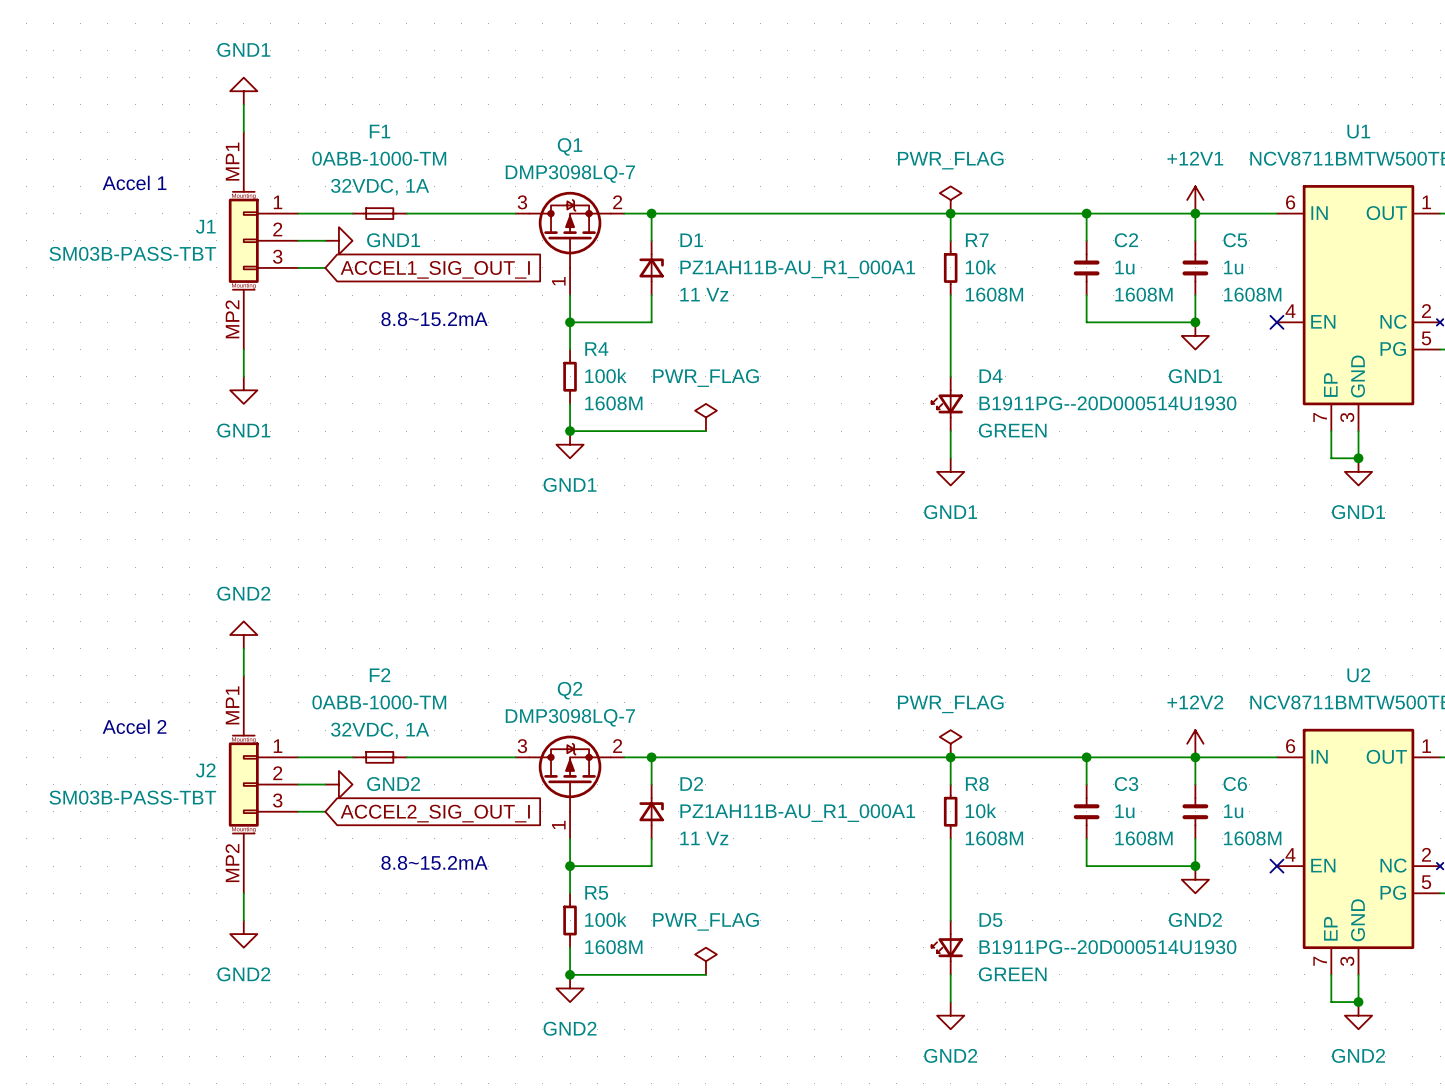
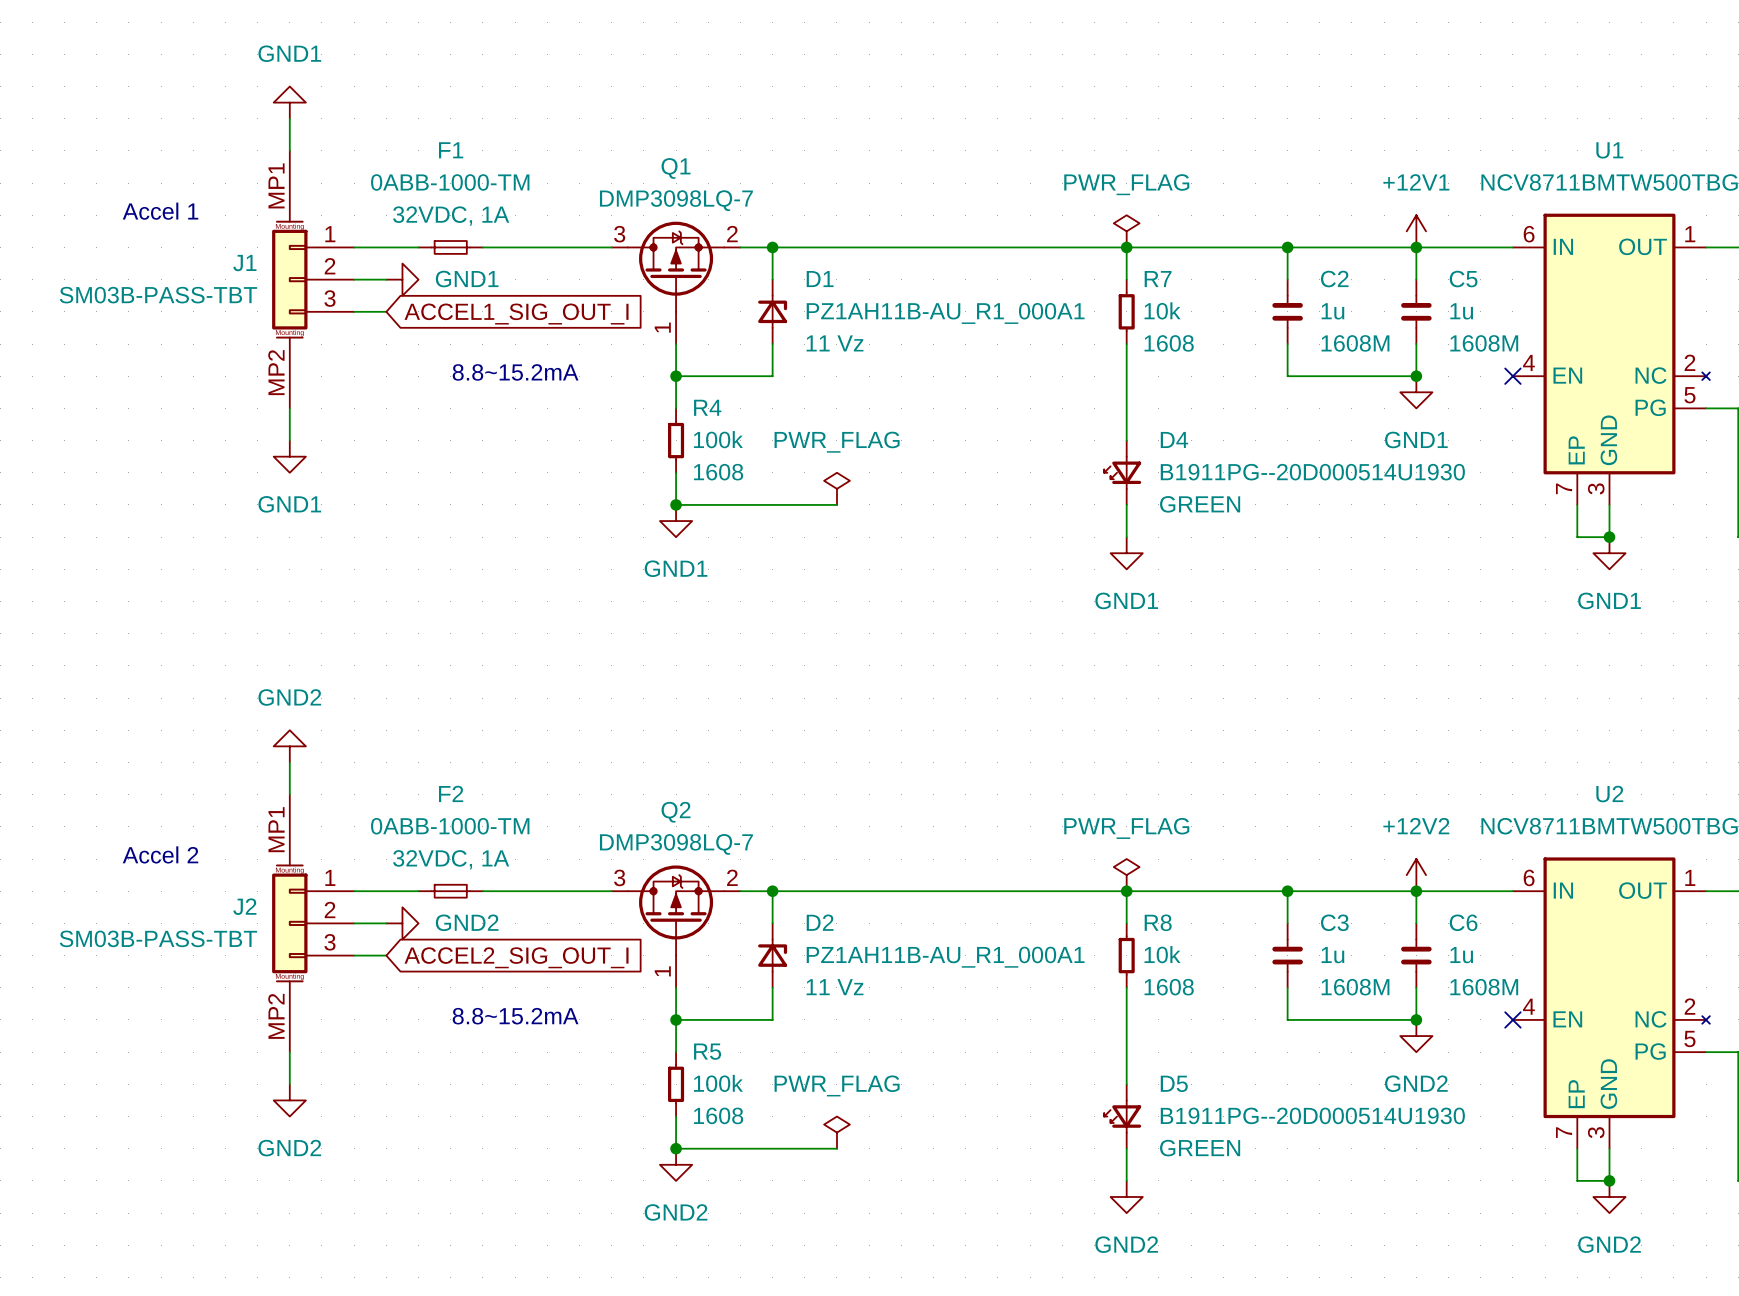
R7 text: 1608M (994, 294) -> 1608 (1169, 343)
R4 text: 1608M (613, 403) -> 1608 (718, 472)
R8 text: 1608M (994, 838) -> 1608 (1169, 987)
R5 text: 1608M (613, 947) -> 1608 (718, 1115)

